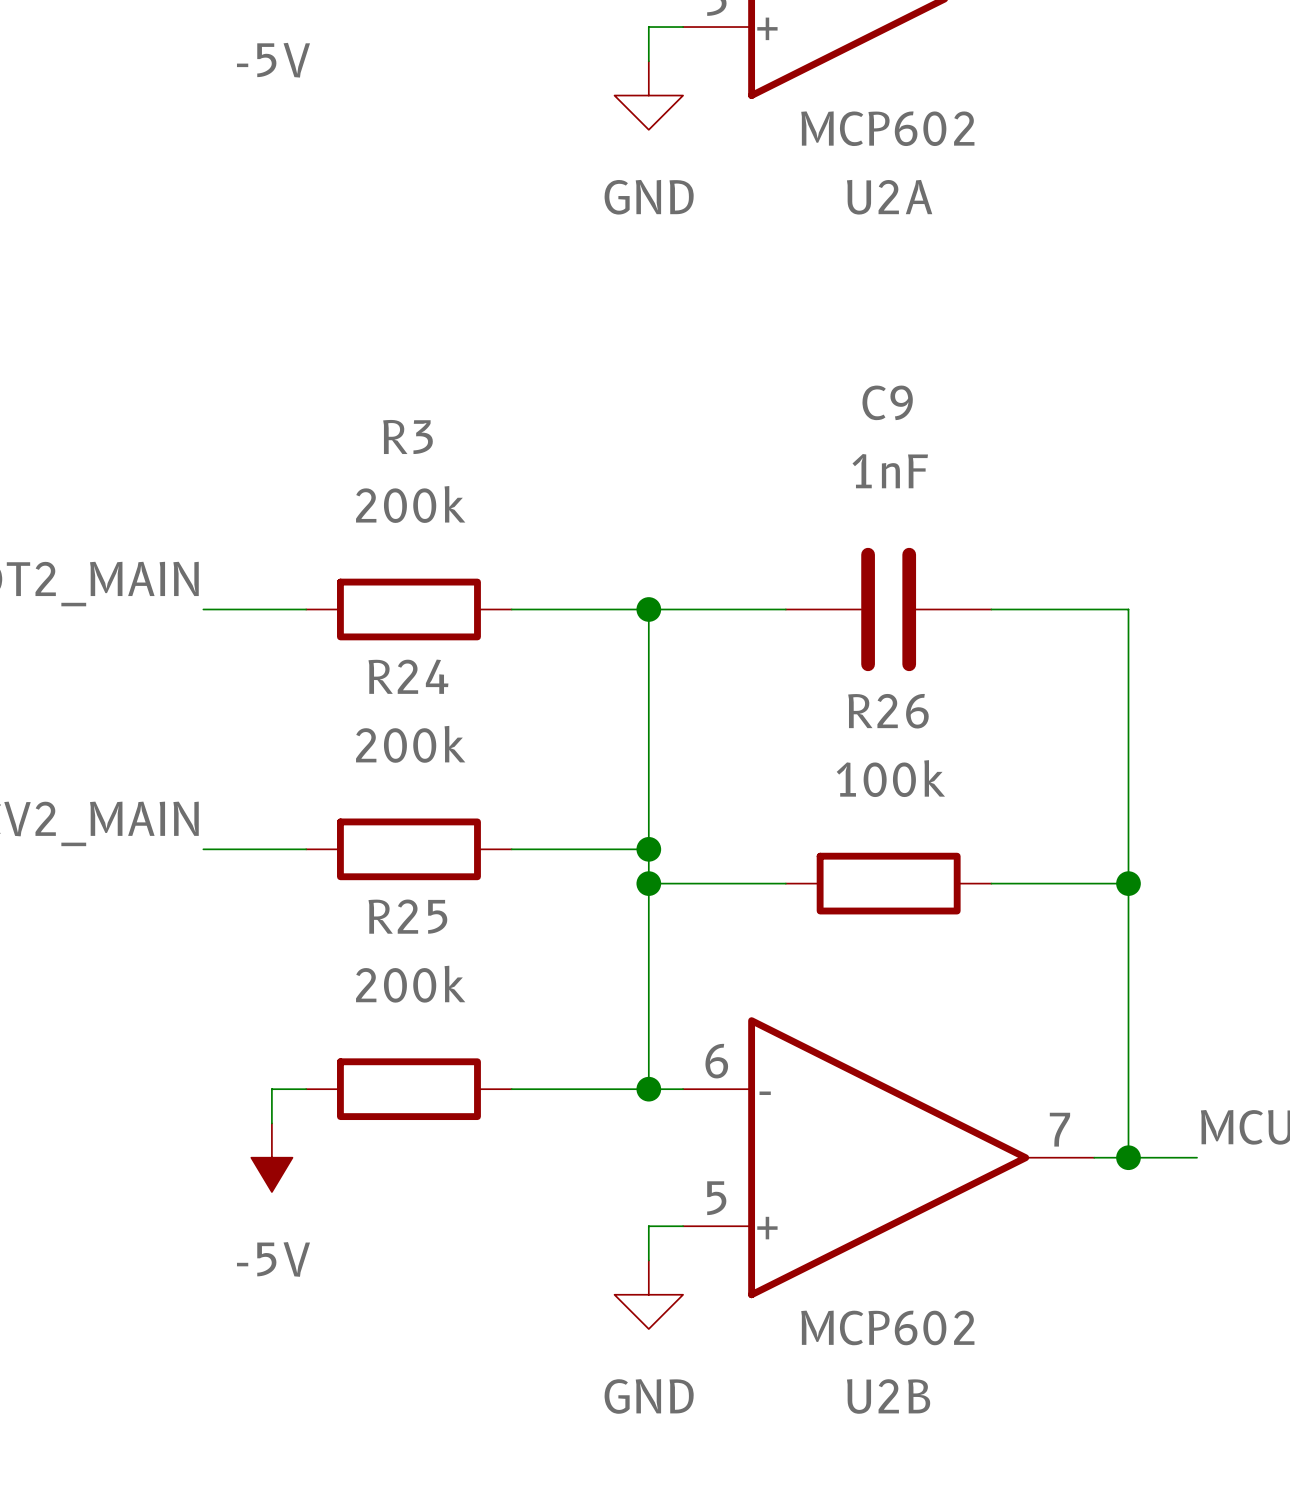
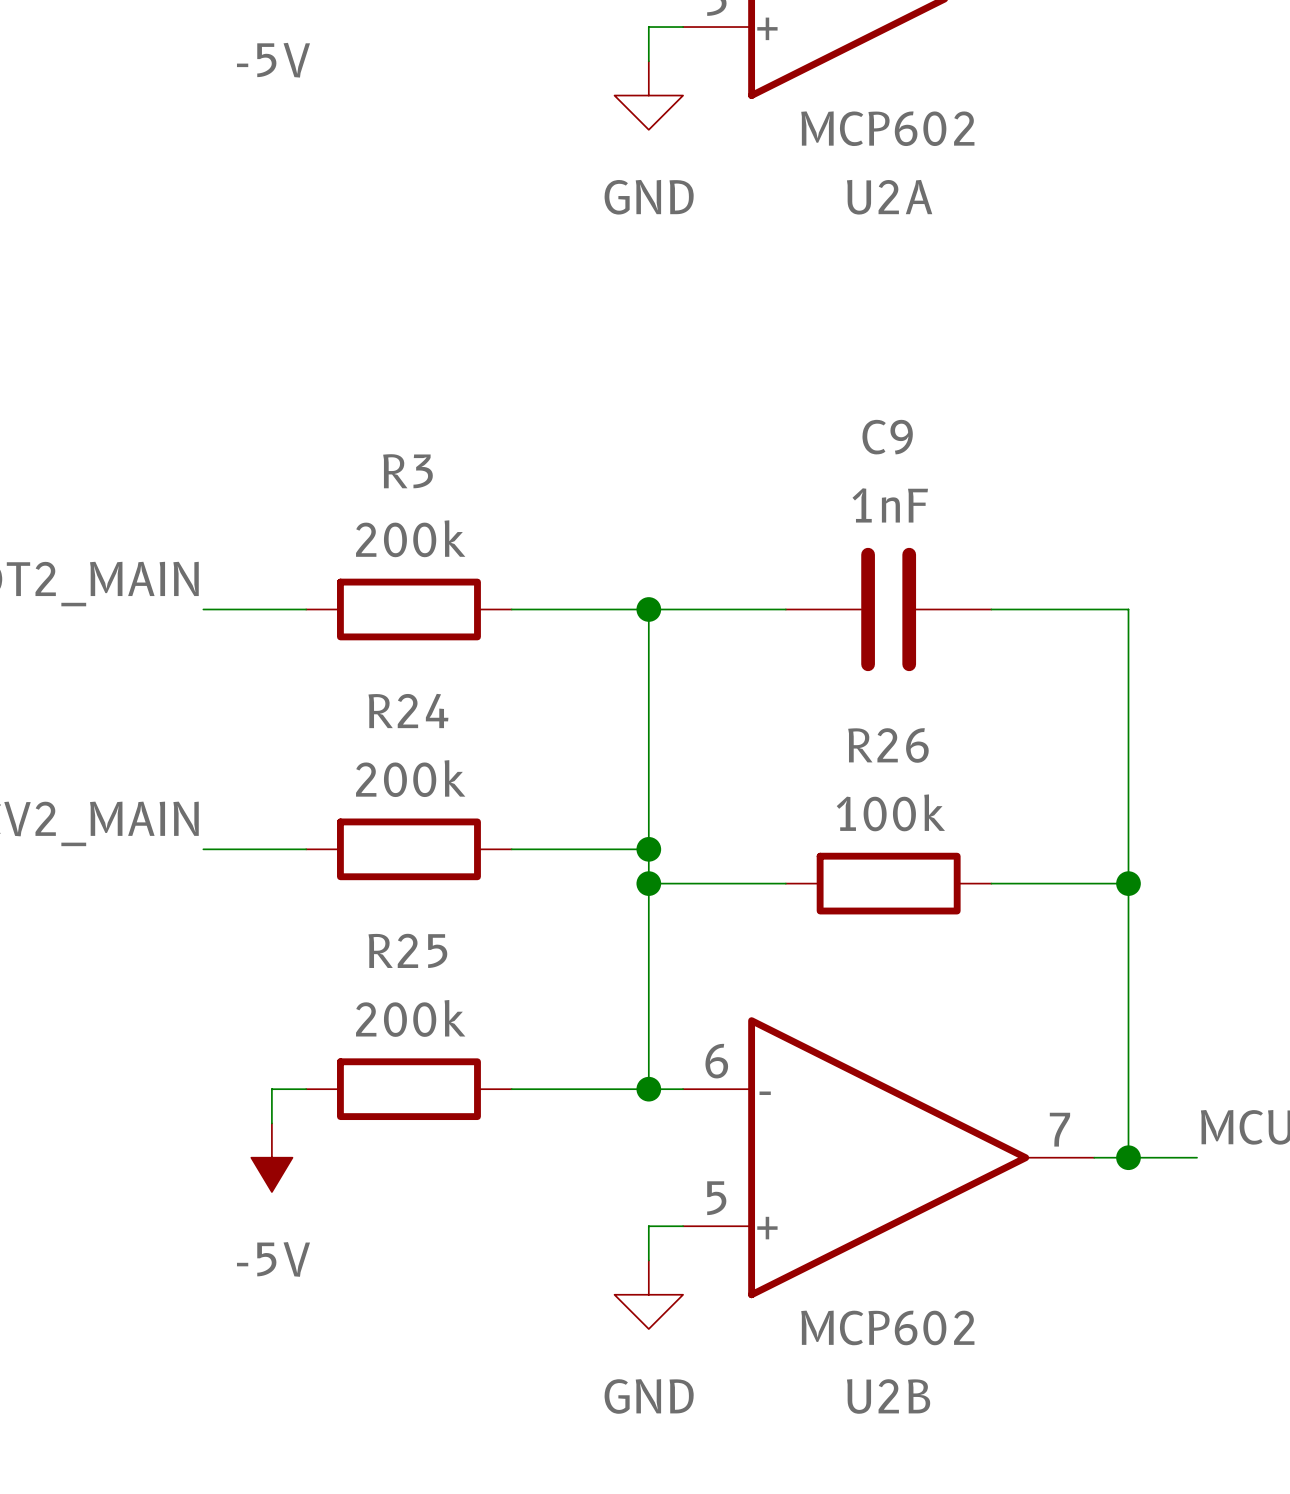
C9 name position: C9 (887, 402) -> C9 (887, 437)
R3 name position: R3 (407, 436) -> R3 (407, 471)
C9 value position: 1nF (890, 471) -> 1nF (890, 505)
R3 value position: 200k (410, 504) -> 200k (410, 538)
R24 name position: R24 (408, 676) -> R24 (408, 711)
R26 name position: R26 (888, 711) -> R26 (888, 745)
R24 value position: 200k (410, 744) -> 200k (410, 778)
R26 value position: 100k (890, 778) -> 100k (890, 812)
R25 name position: R25 (407, 916) -> R25 (407, 950)
R25 value position: 200k (410, 984) -> 200k (410, 1018)

